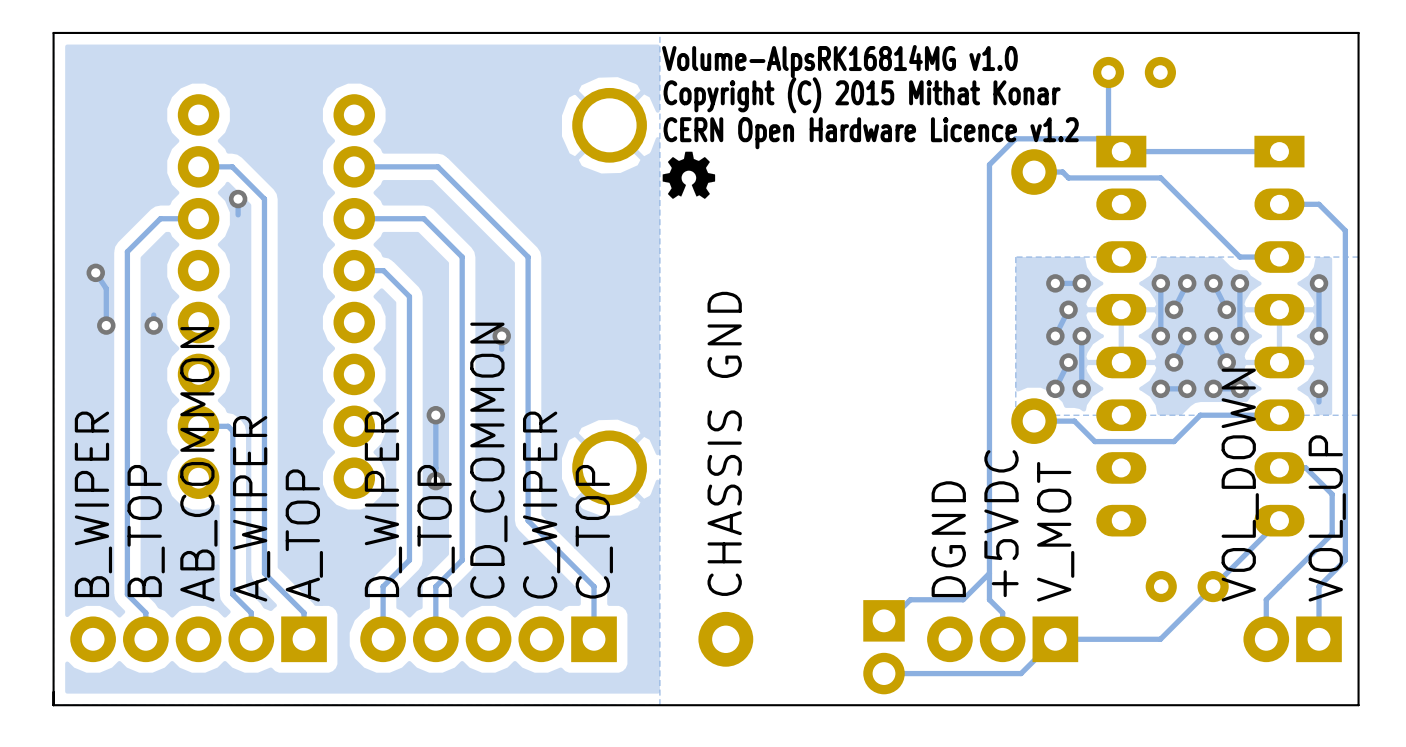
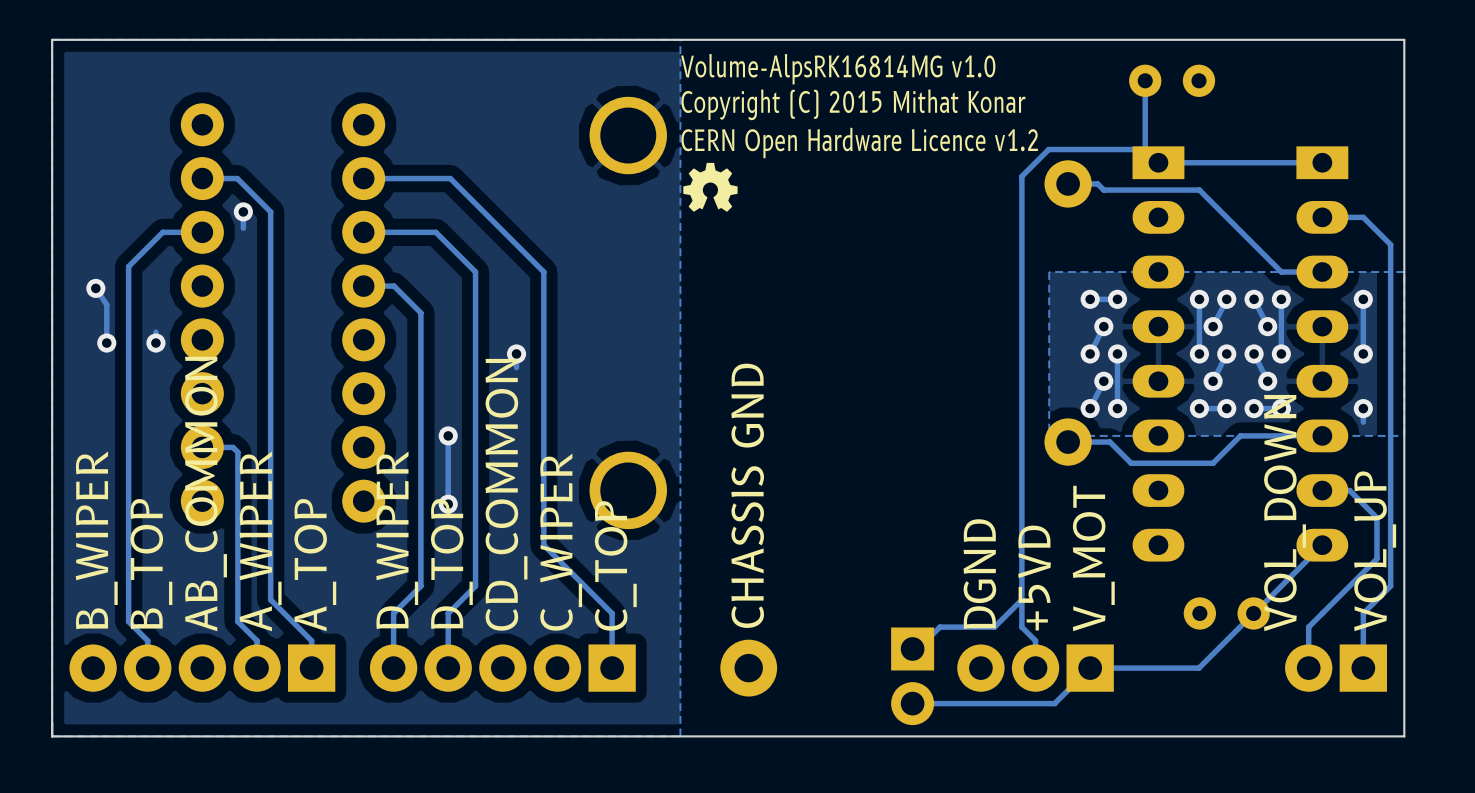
text: +5VDC (1001, 523) -> +5VD (1034, 578)

